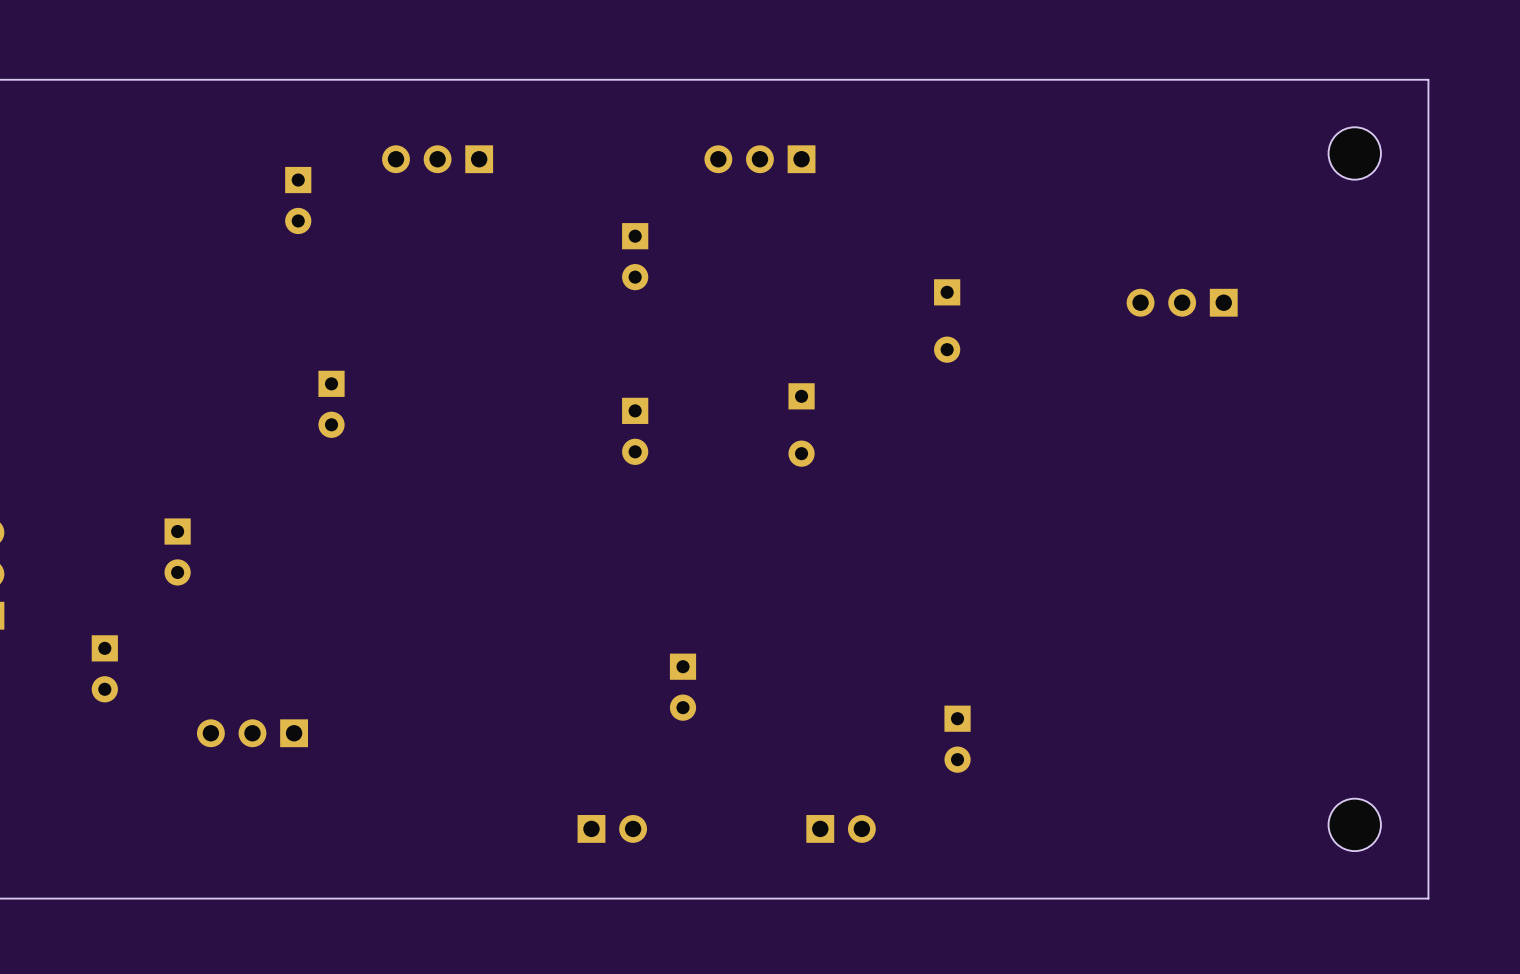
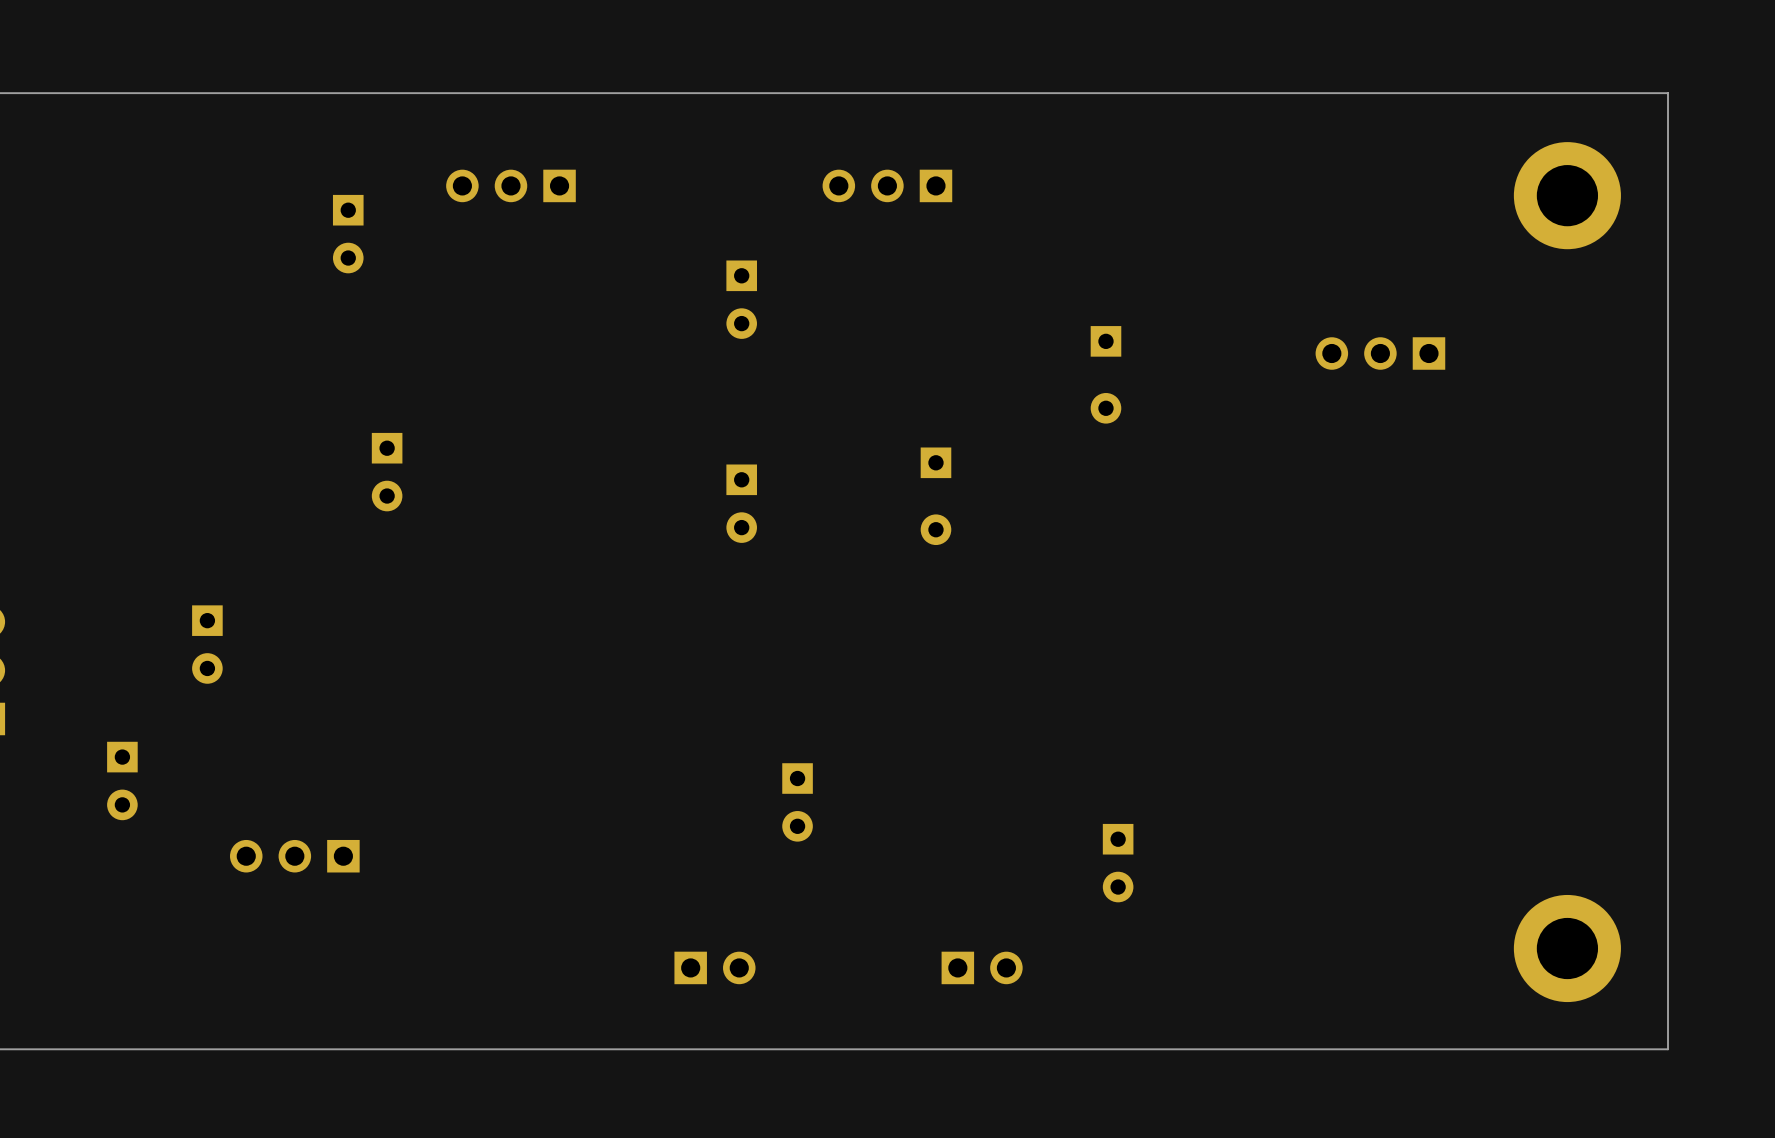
part: (1354, 153) -> none
part: none -> (1567, 195)
part: none -> (1567, 948)
part: (1354, 824) -> none

